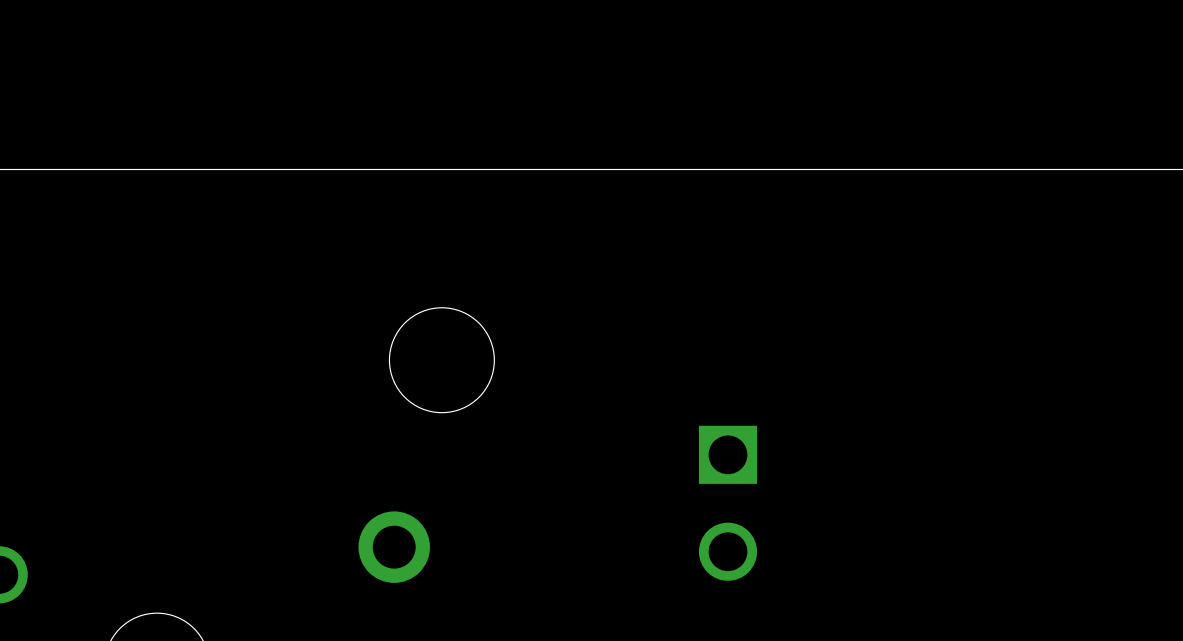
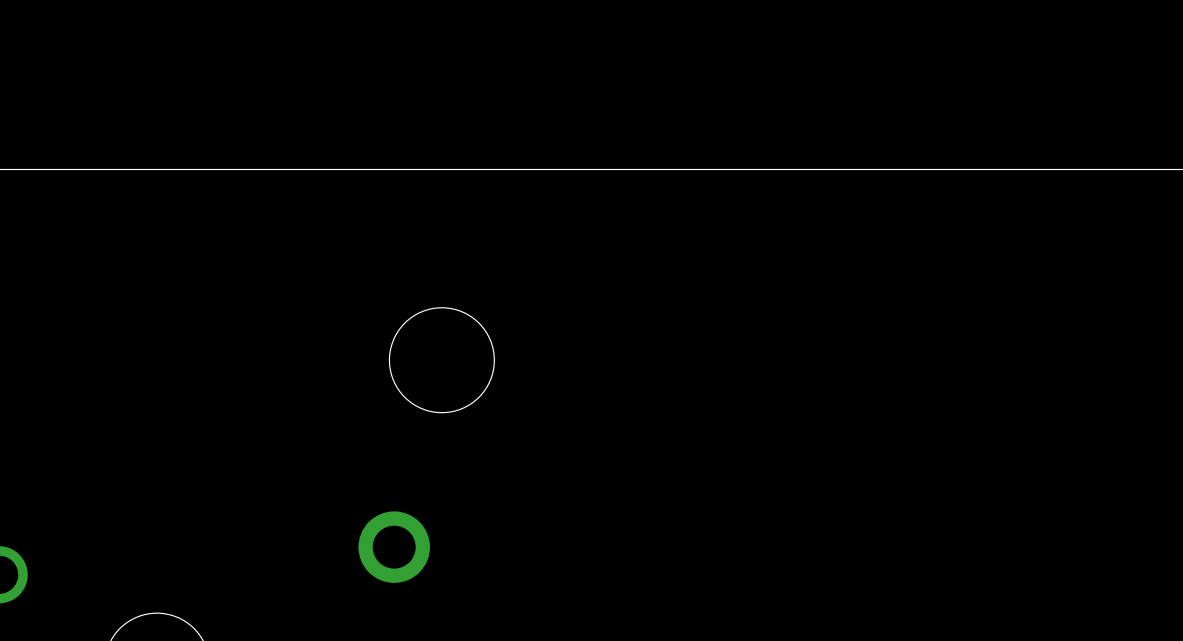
part: (727, 503) -> none

